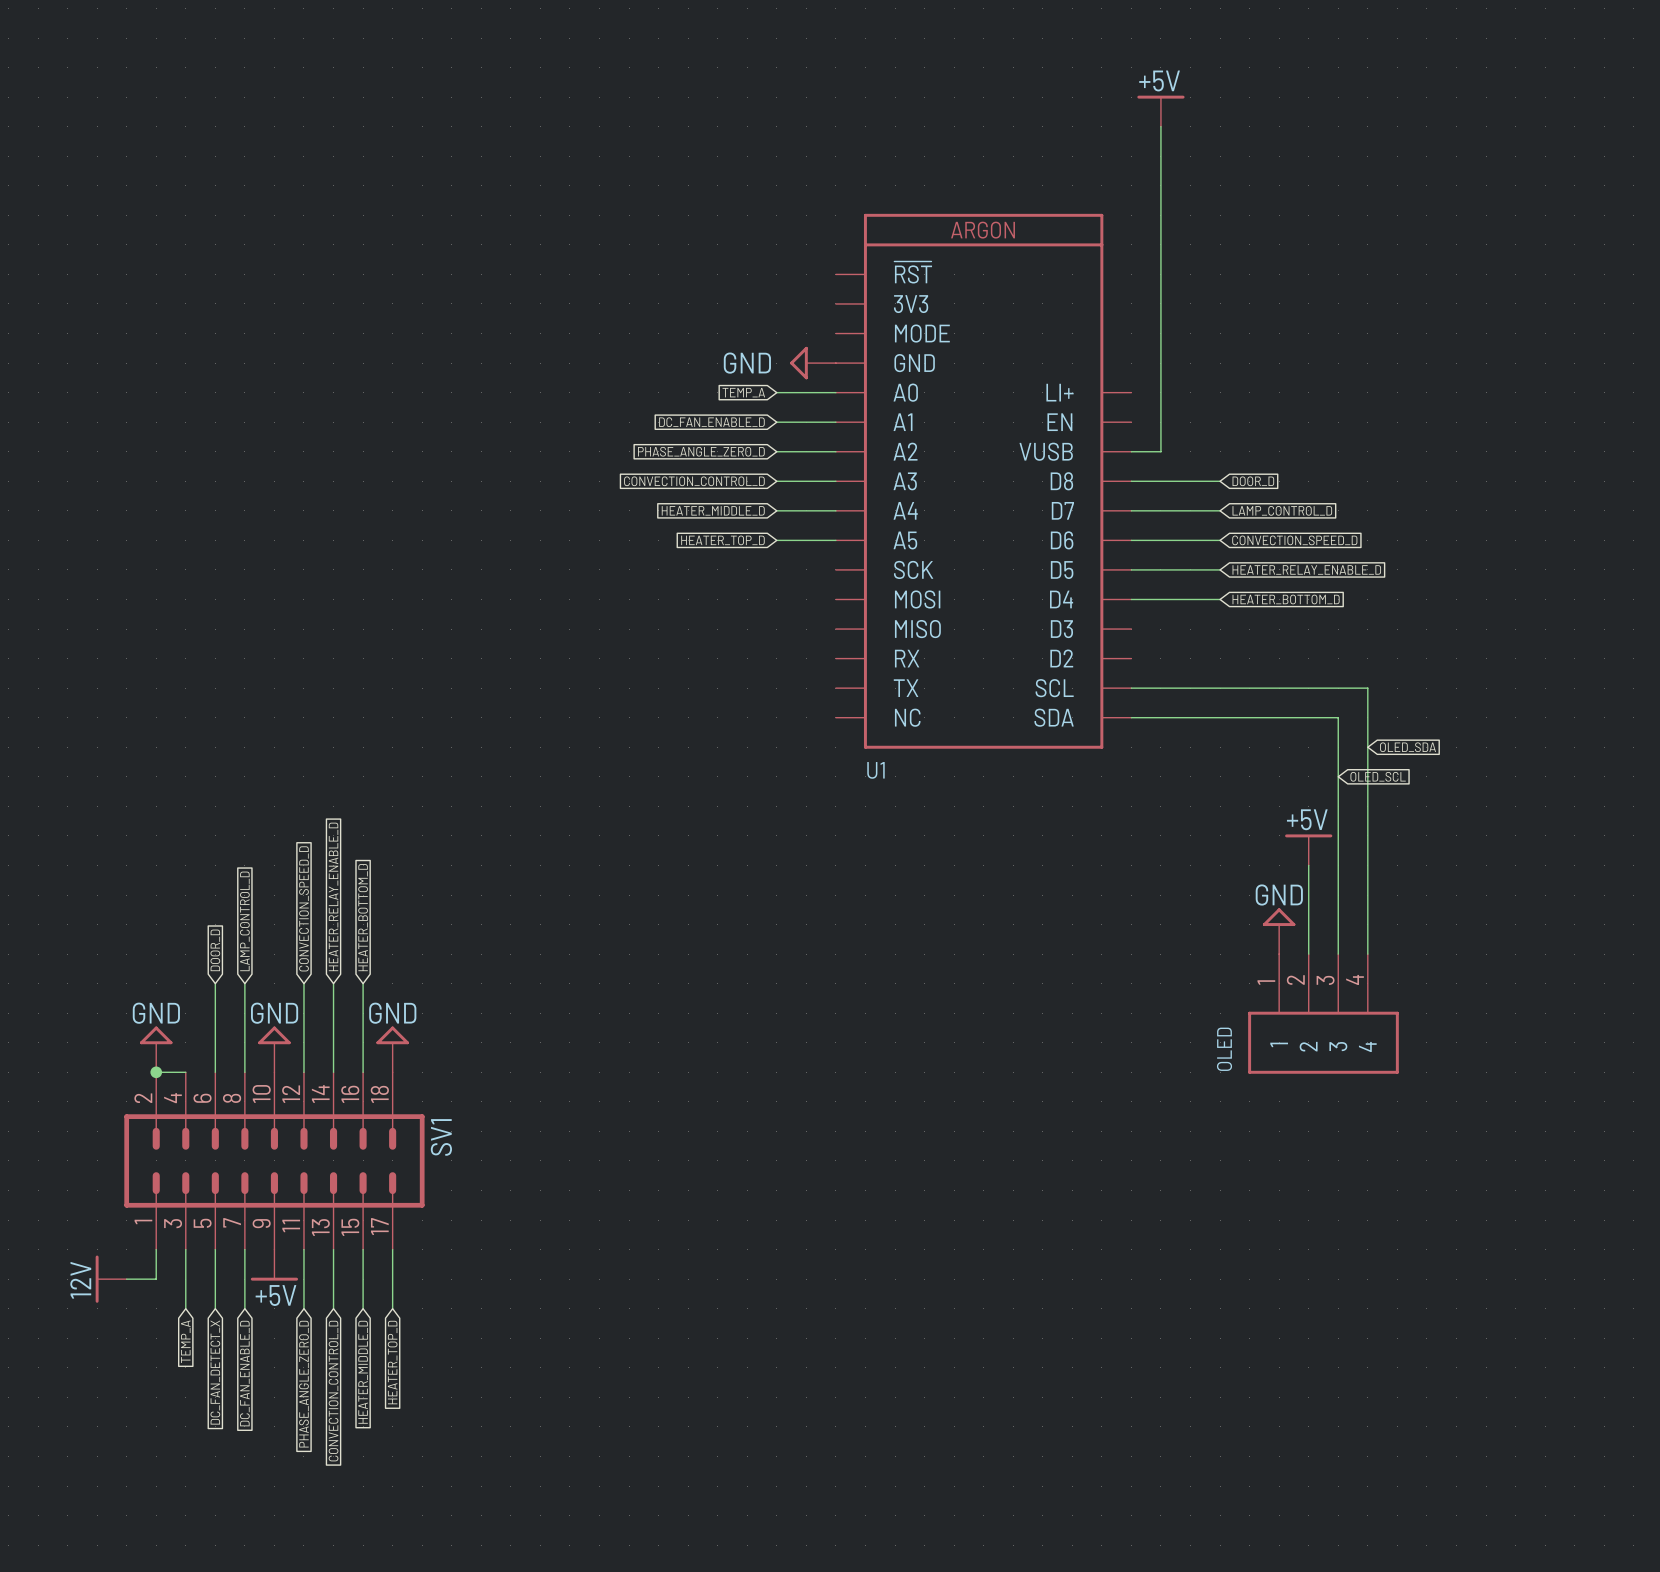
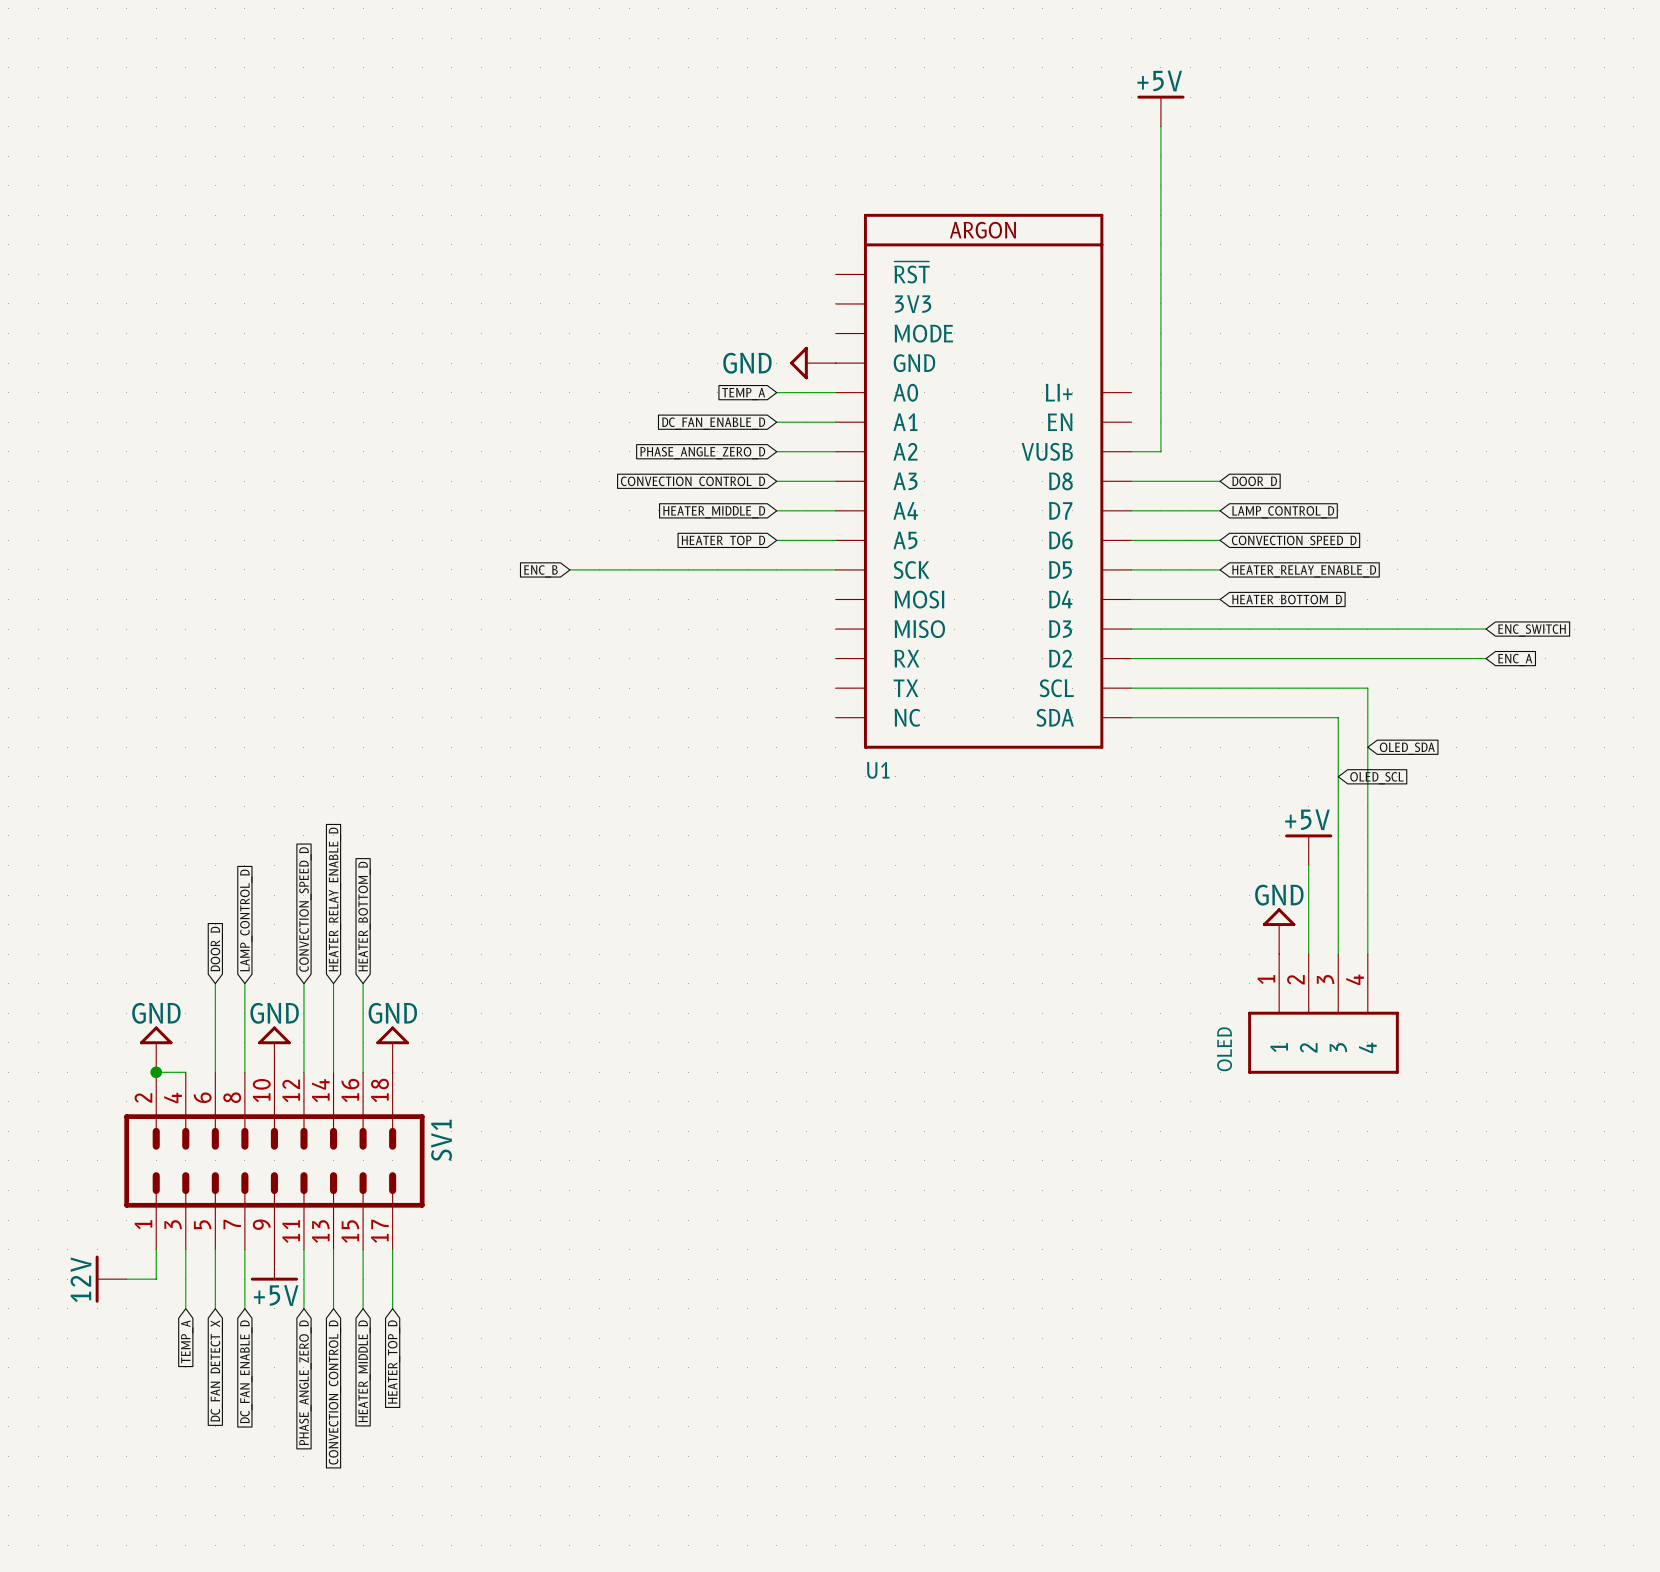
global label: none -> ENC_B (540, 571)
wire: none -> (569, 569) (835, 569)
wire: none -> (1131, 629) (1486, 629)
global label: none -> ENC_SWITCH (1532, 630)
wire: none -> (1131, 658) (1486, 658)
global label: none -> ENC_A (1515, 660)

